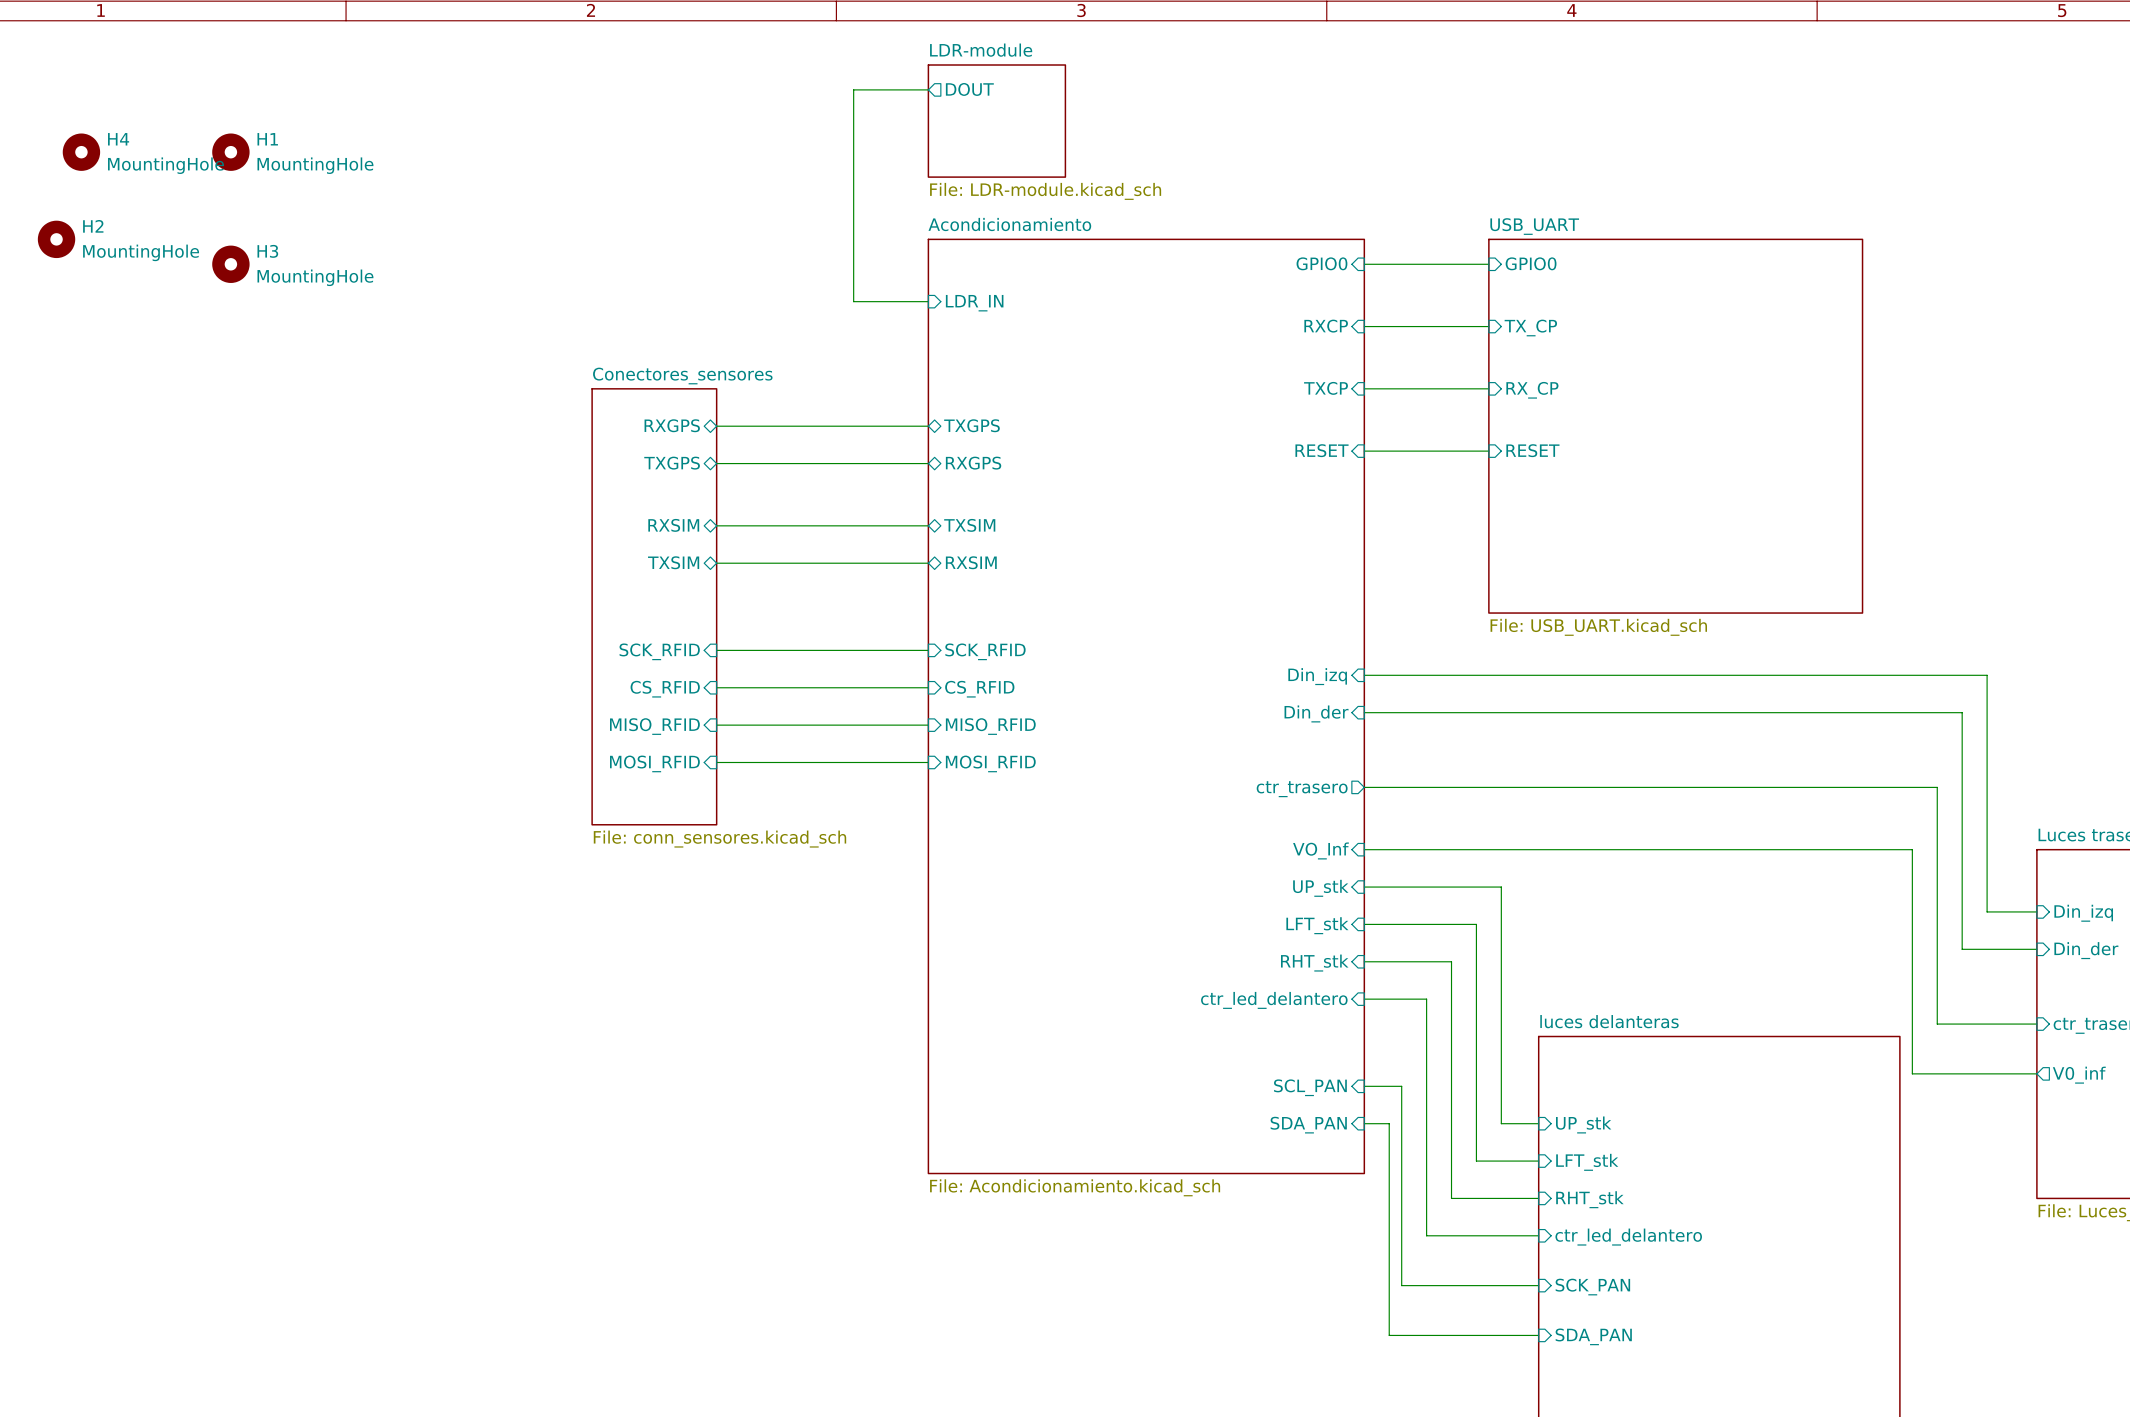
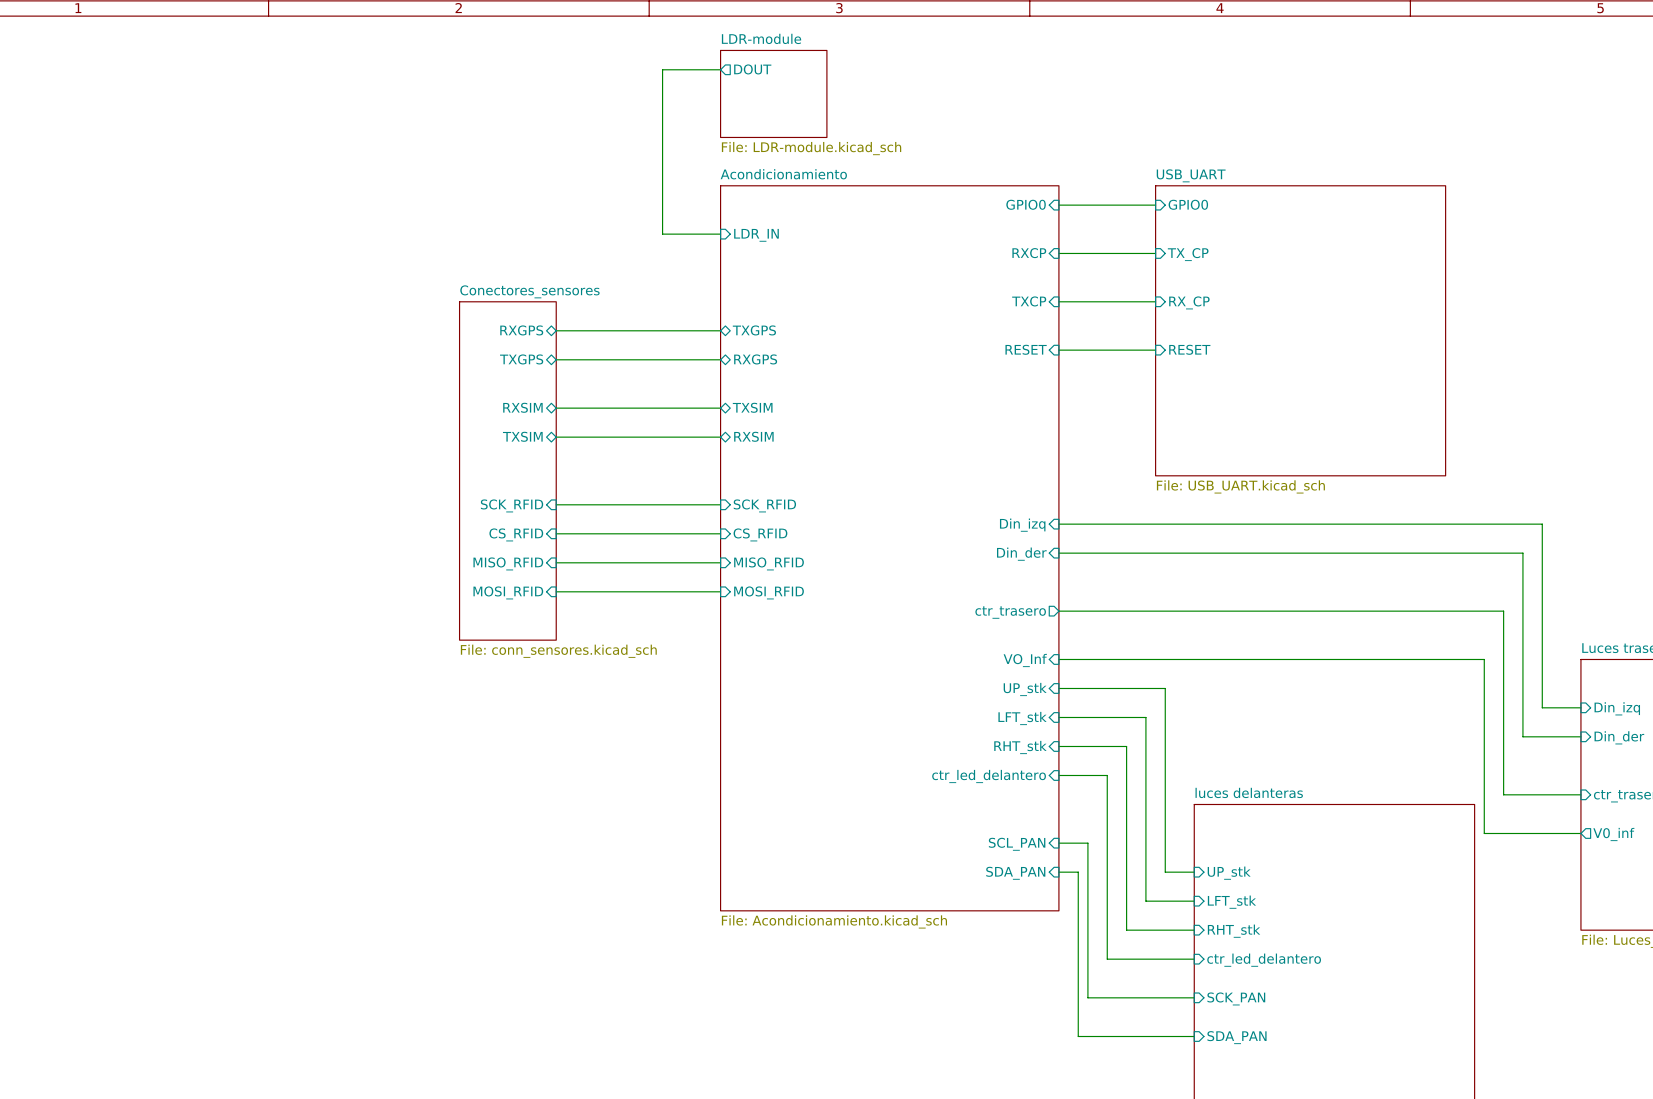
H4: MountingHole (81, 152) -> none
H1: MountingHole (230, 152) -> none
H2: MountingHole (56, 239) -> none
H3: MountingHole (230, 264) -> none

